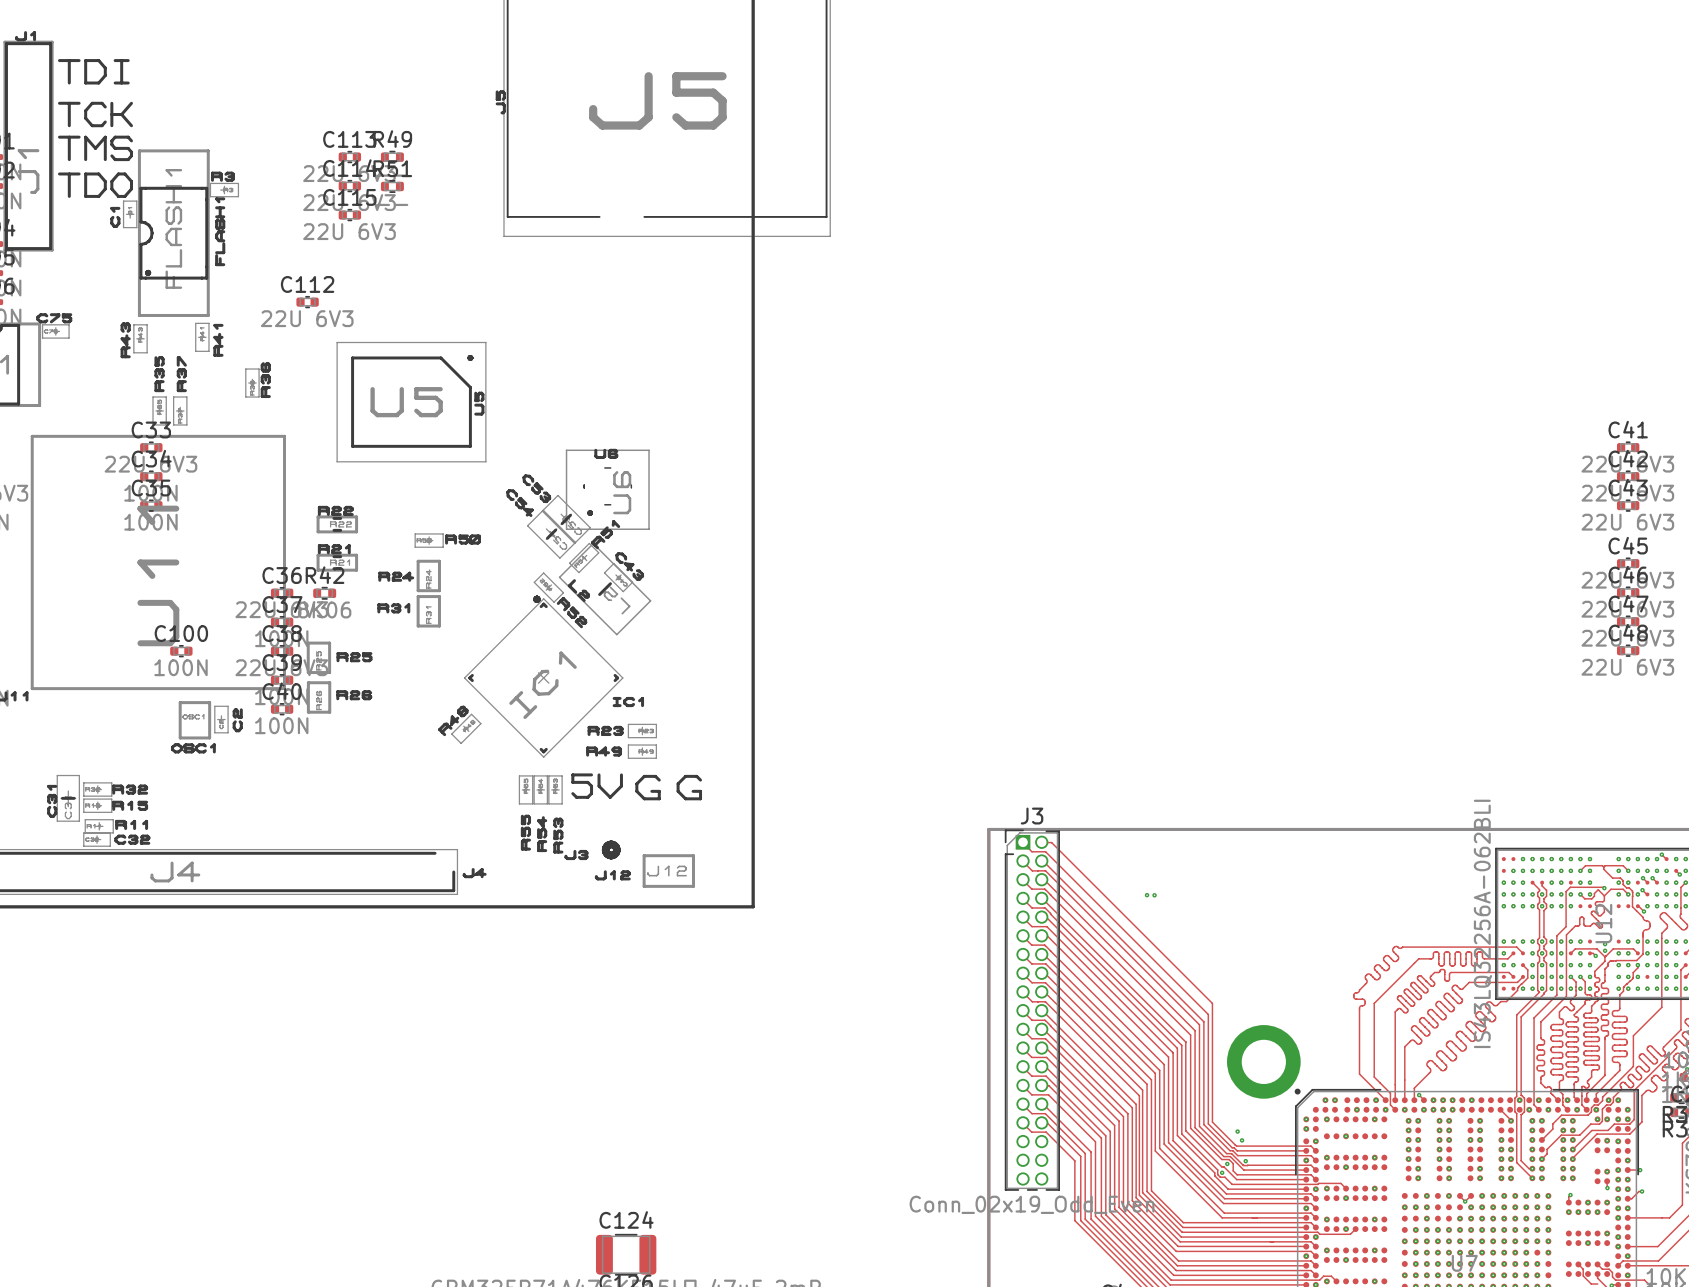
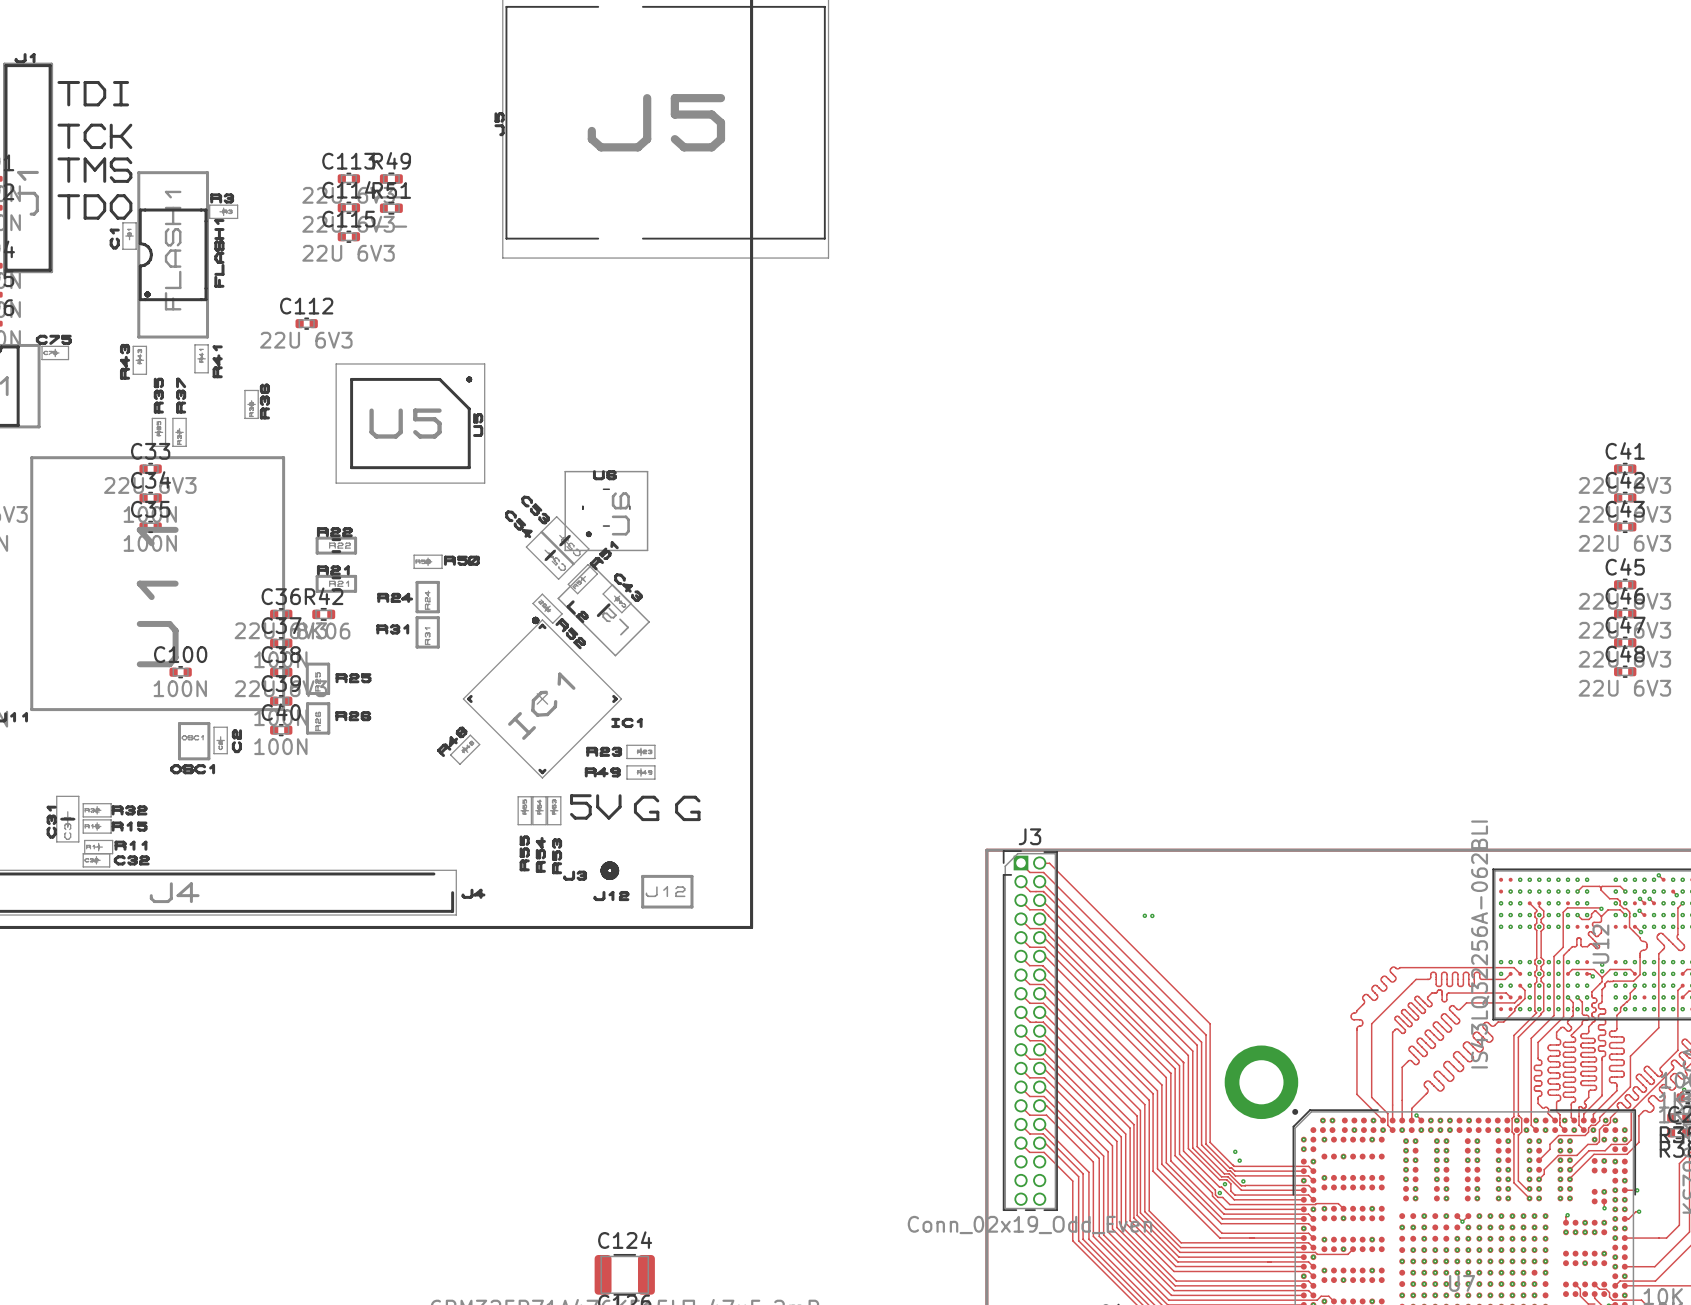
track: (1500, 1109) (1511, 1120) -> none
via: none -> (1497, 1130)
via: (1374, 1157) -> none
via: (1346, 1167) -> none

